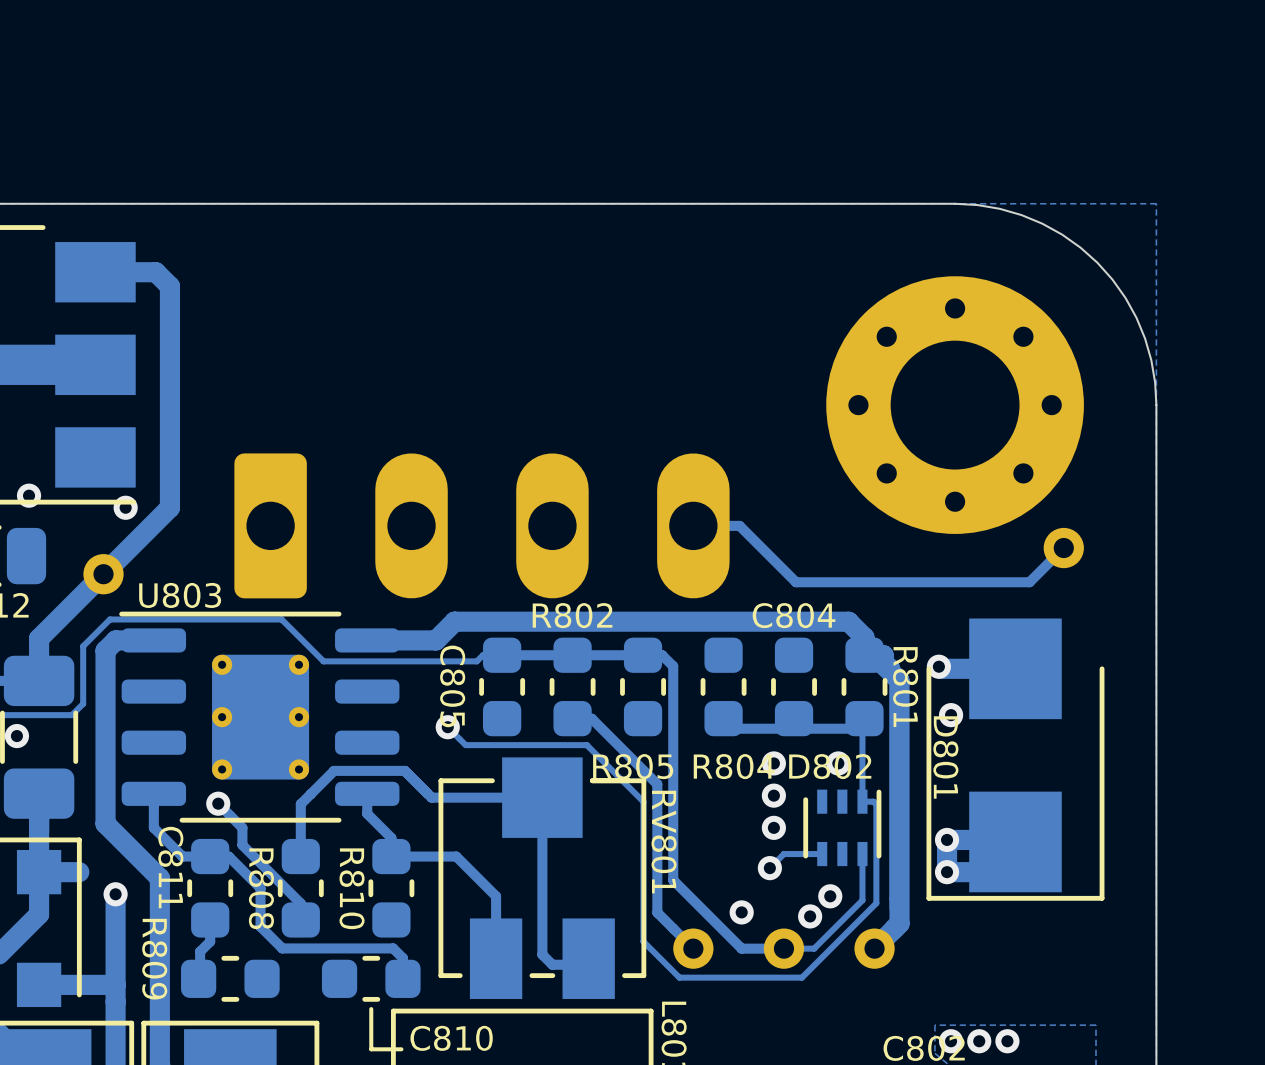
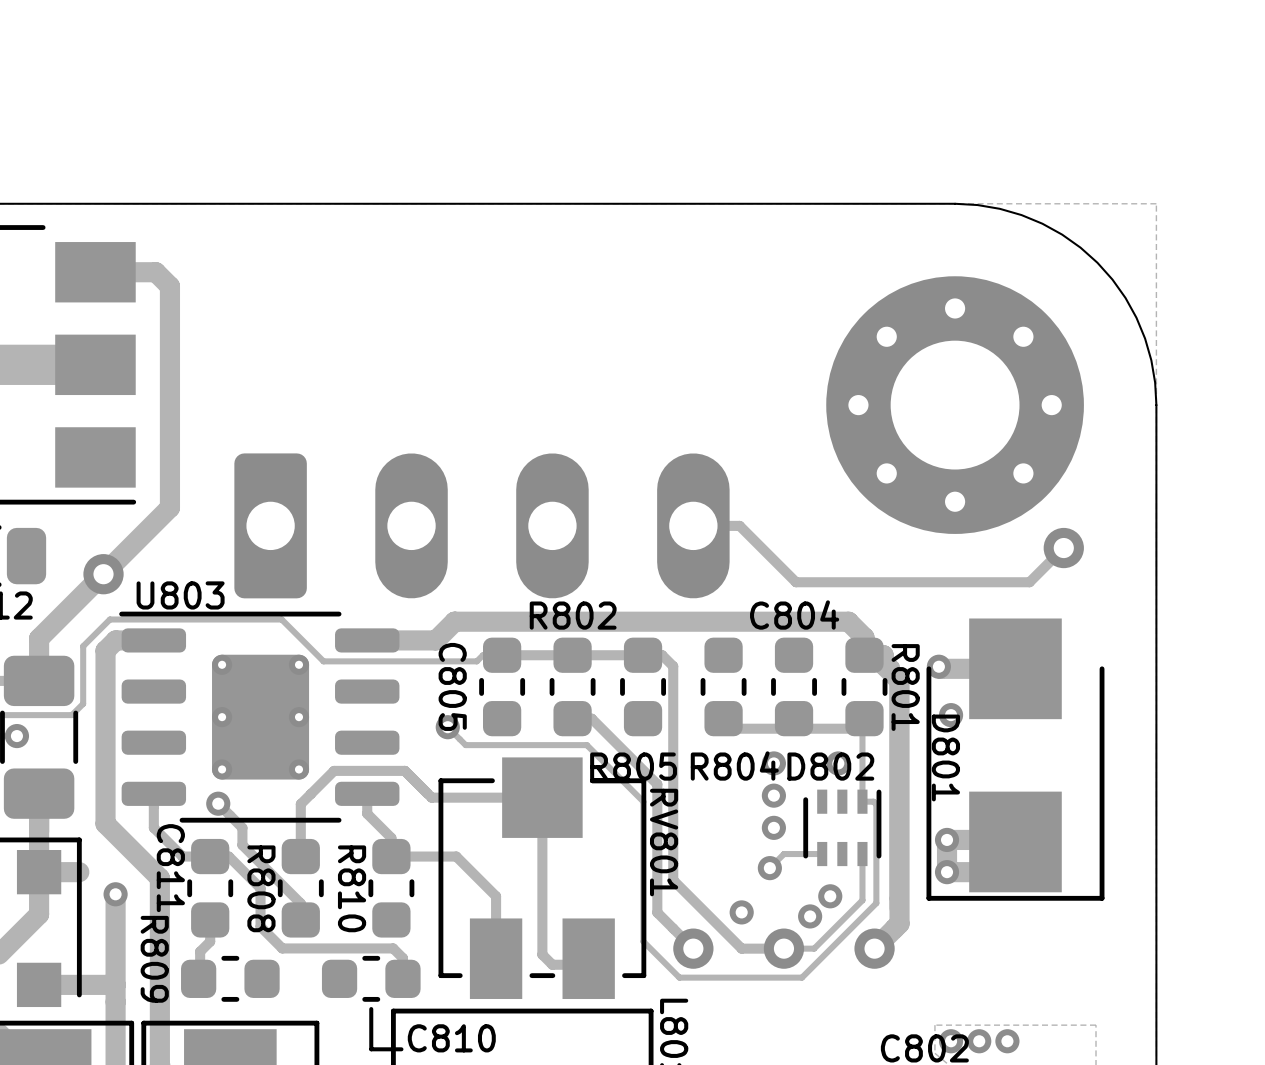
via: (29, 495) -> none
via: (125, 507) -> none

